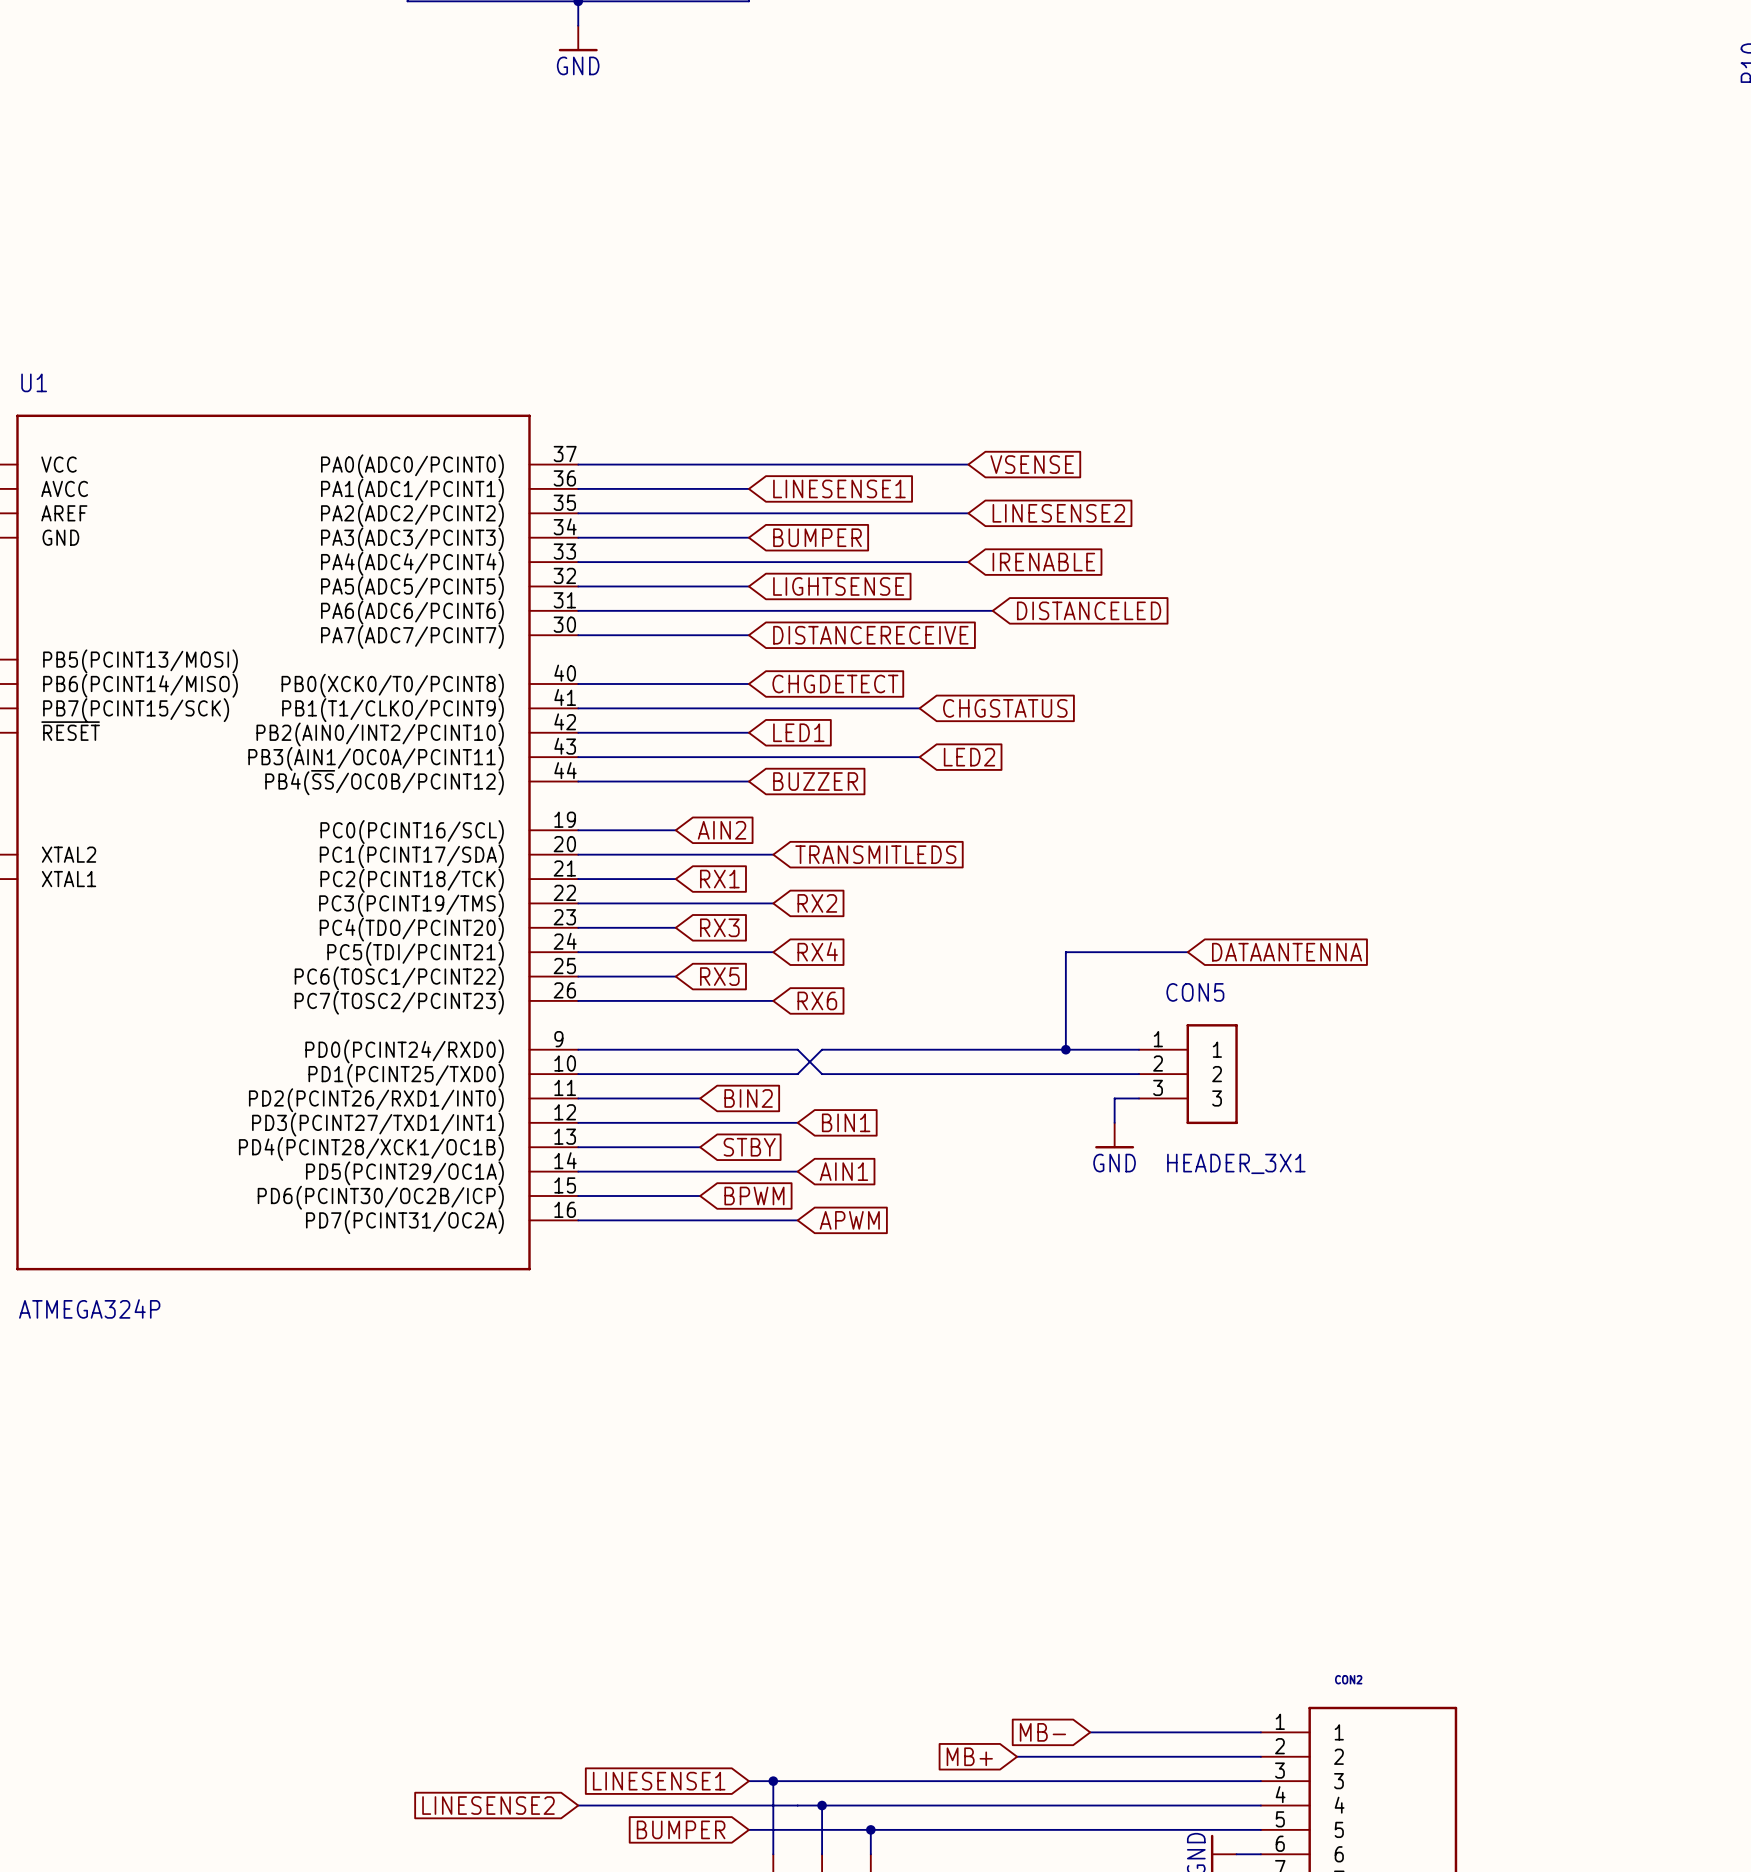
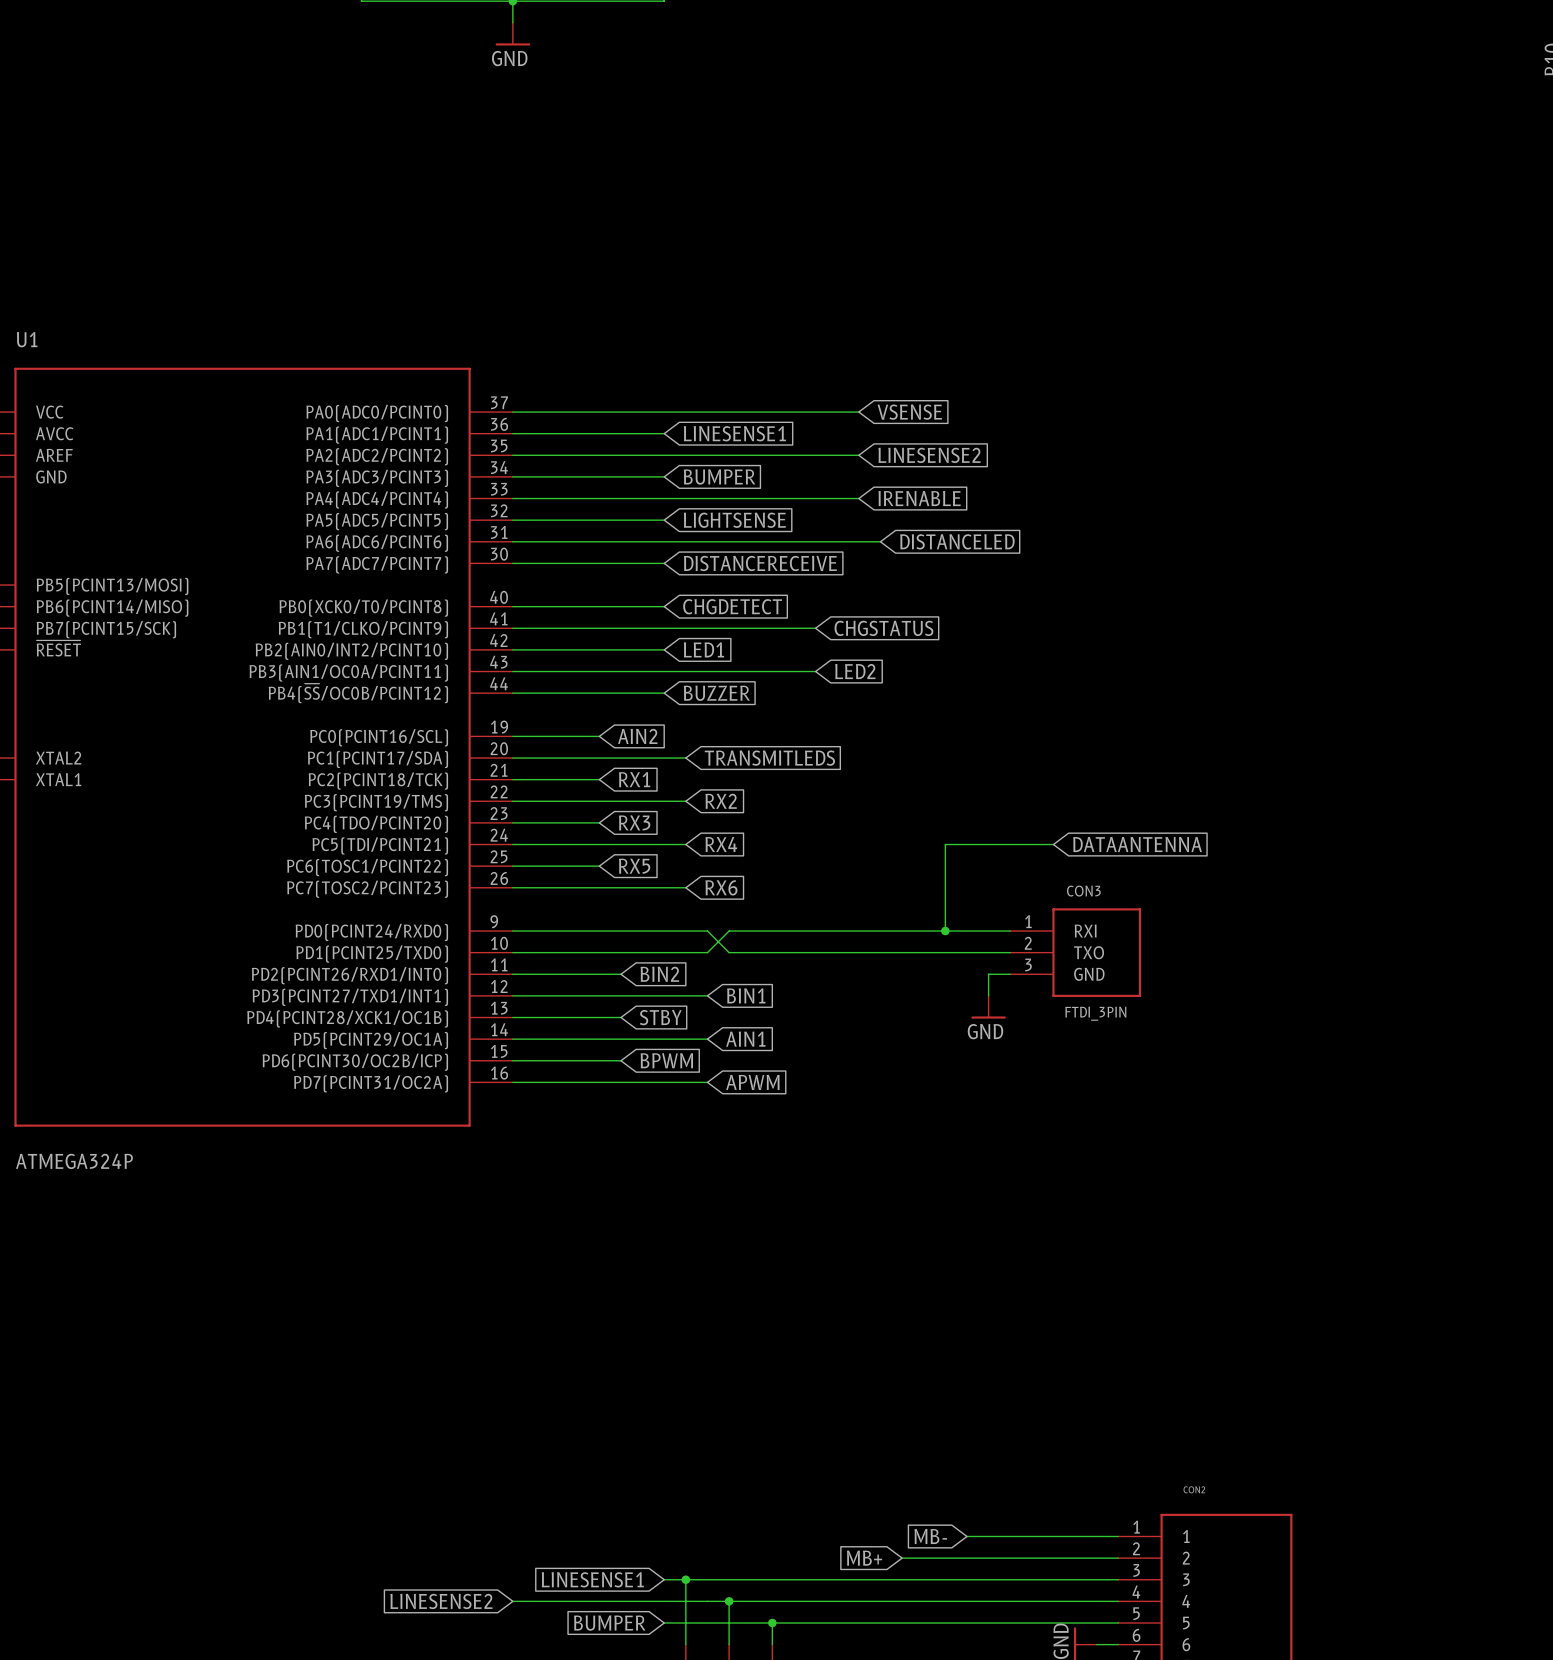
CON5: HEADER_3X1 (1188, 1074) -> none
CON3: none -> FTDI_3PIN (1075, 952)

